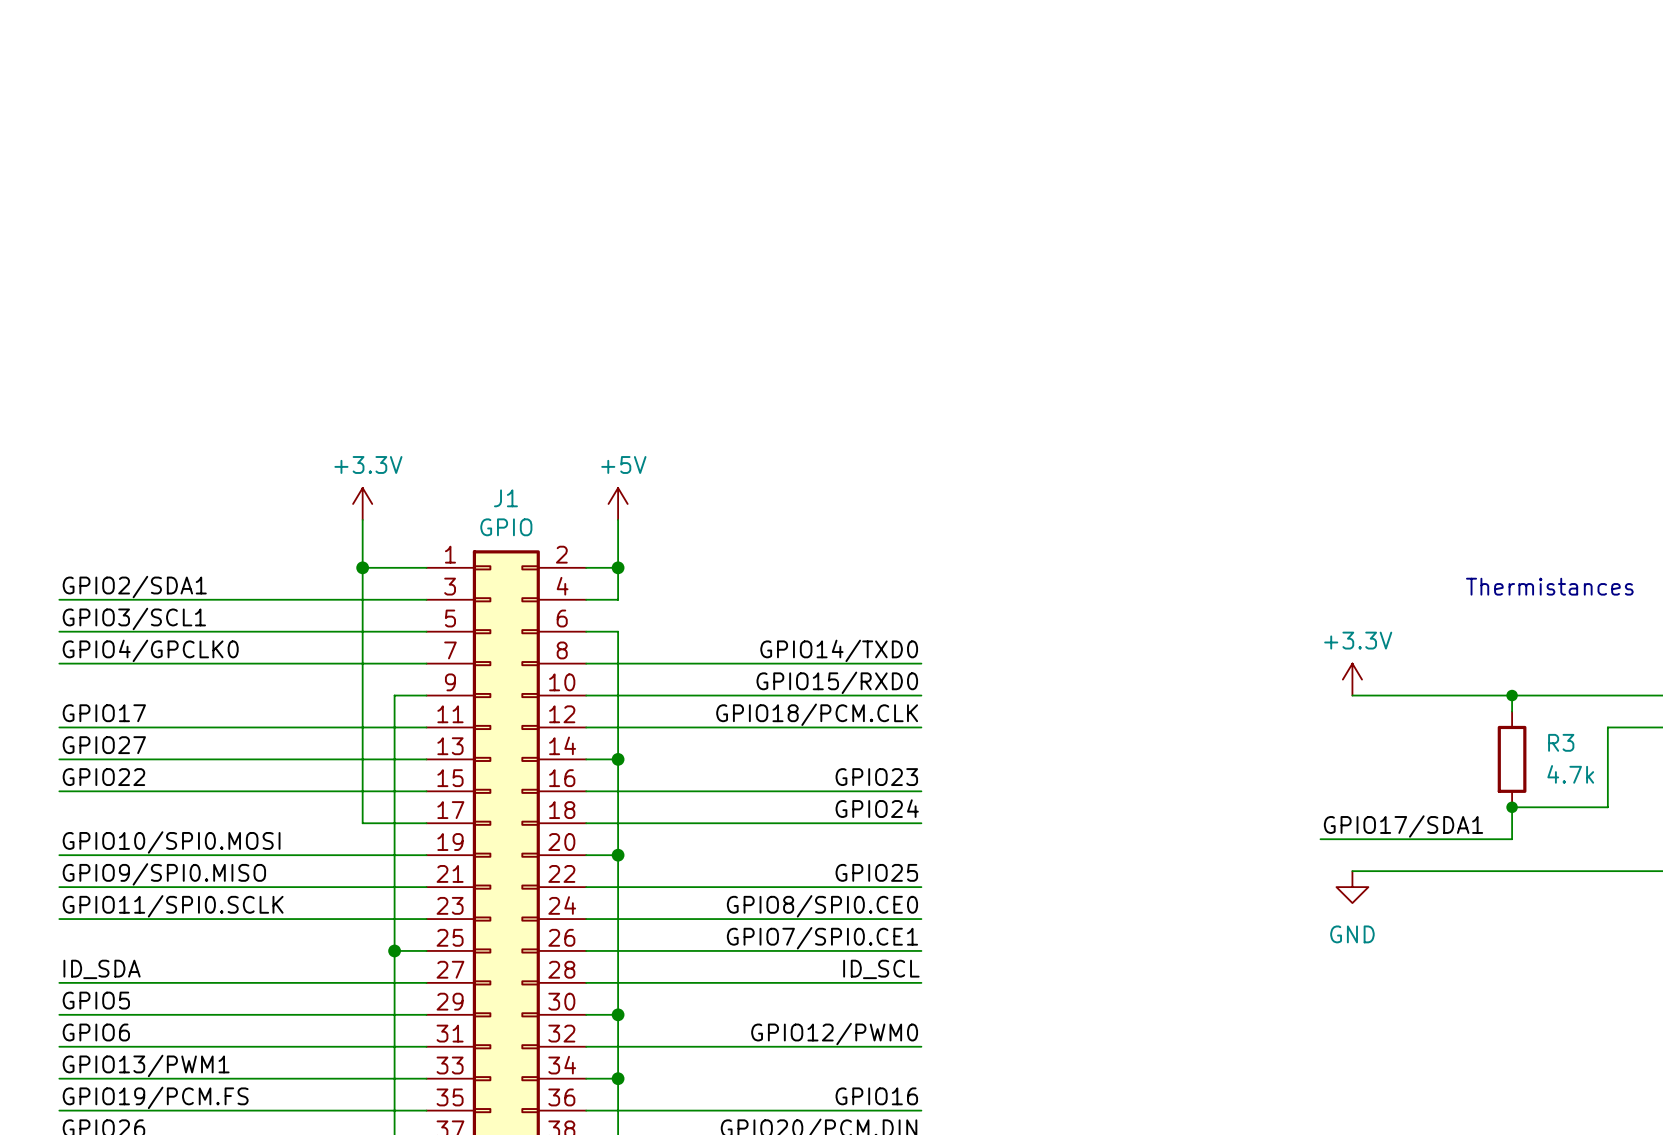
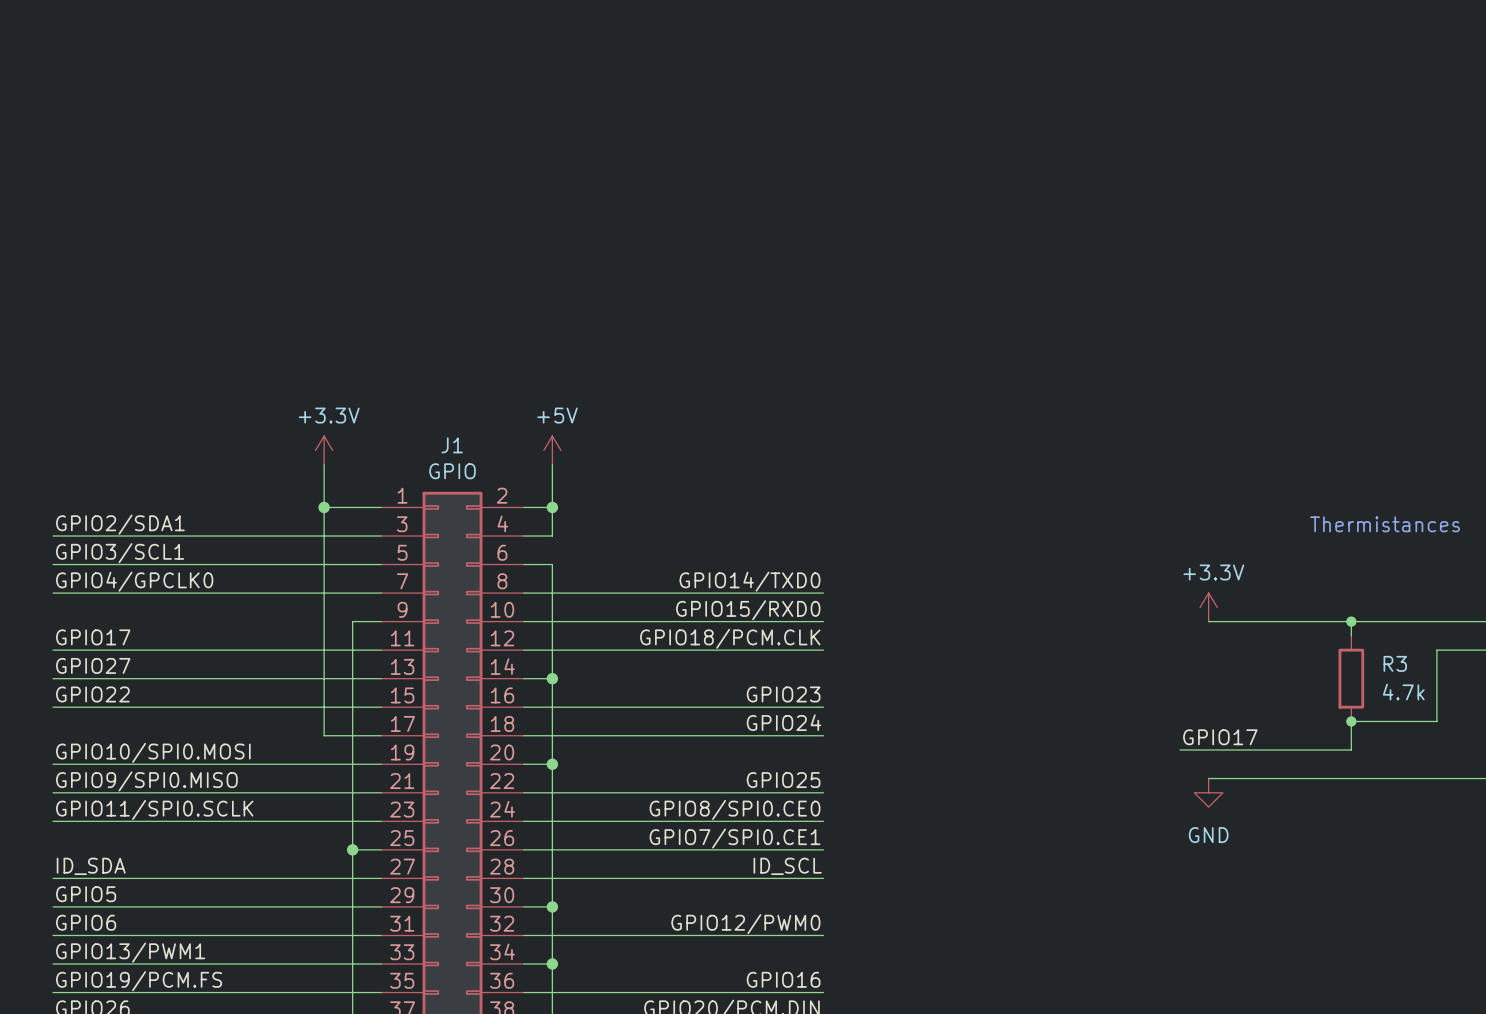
label: GPIO17/SDA1 (1403, 826) -> GPIO17 (1220, 737)

